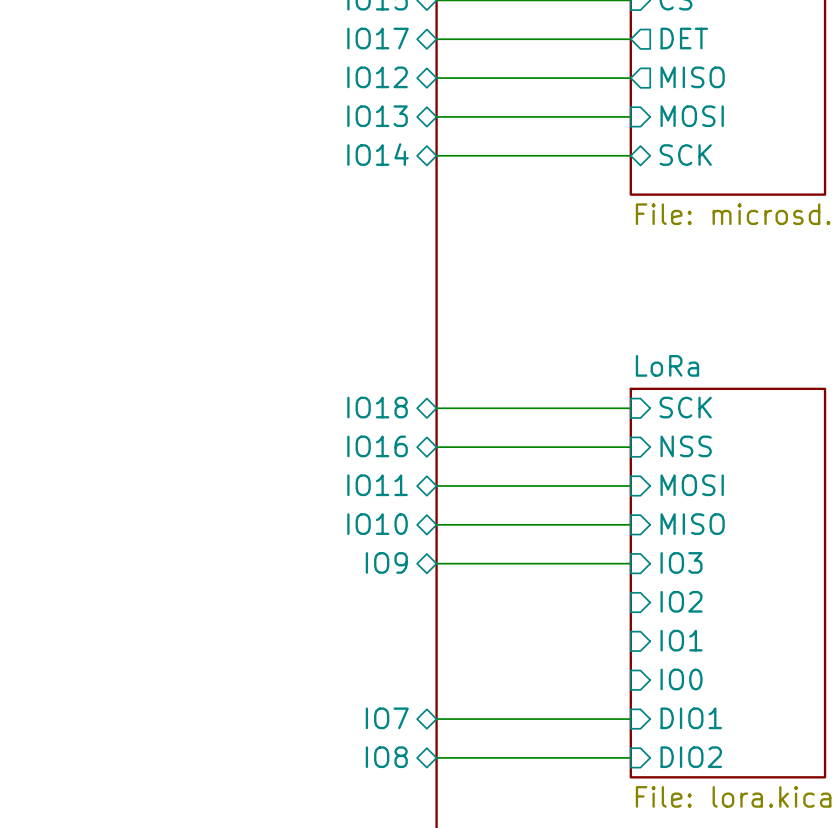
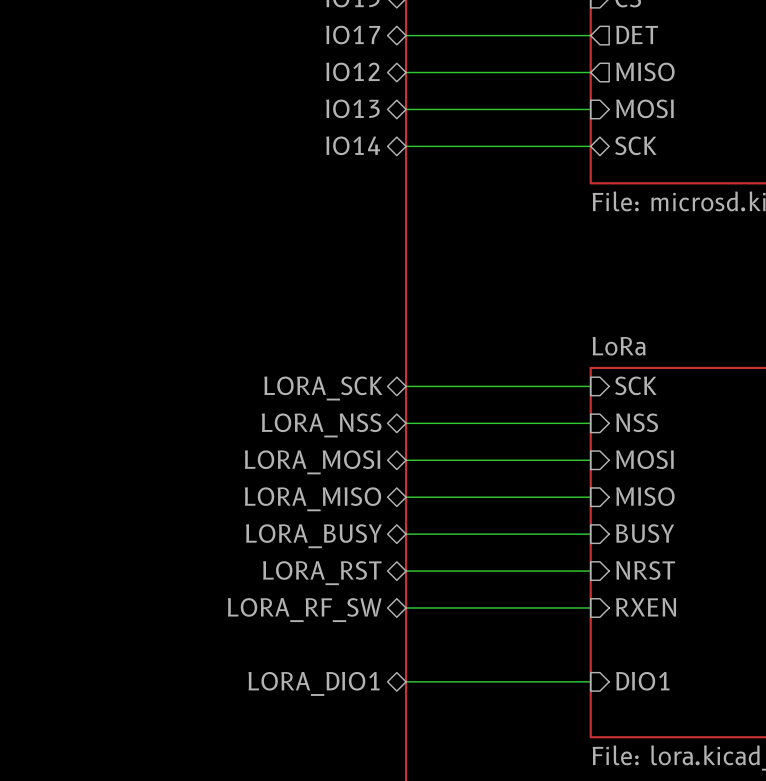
sheet pin: IO18 (377, 407) -> LORA_SCK (323, 388)
sheet pin: IO16 (377, 446) -> LORA_NSS (321, 425)
sheet pin: IO11 (377, 485) -> LORA_MOSI (312, 462)
sheet pin: IO10 (377, 524) -> LORA_MISO (312, 499)
sheet pin: IO9 (386, 562) -> LORA_BUSY (313, 536)
sheet pin: IO3 (681, 562) -> BUSY (645, 533)
sheet pin: IO2 (681, 601) -> NRST (645, 570)
sheet pin: none -> LORA_RST (322, 573)
wire: none -> (406, 571) (590, 571)
sheet pin: IO1 (681, 640) -> RXEN (646, 607)
sheet pin: none -> LORA_RF_SW (304, 610)
sheet pin: IO0 (681, 679) -> none
sheet pin: IO7 (387, 718) -> LORA_DIO1 (314, 683)
sheet pin: IO8 (386, 757) -> none
wire: (436, 757) (630, 757) -> (406, 607) (590, 607)
sheet pin: DIO2 (691, 757) -> none

